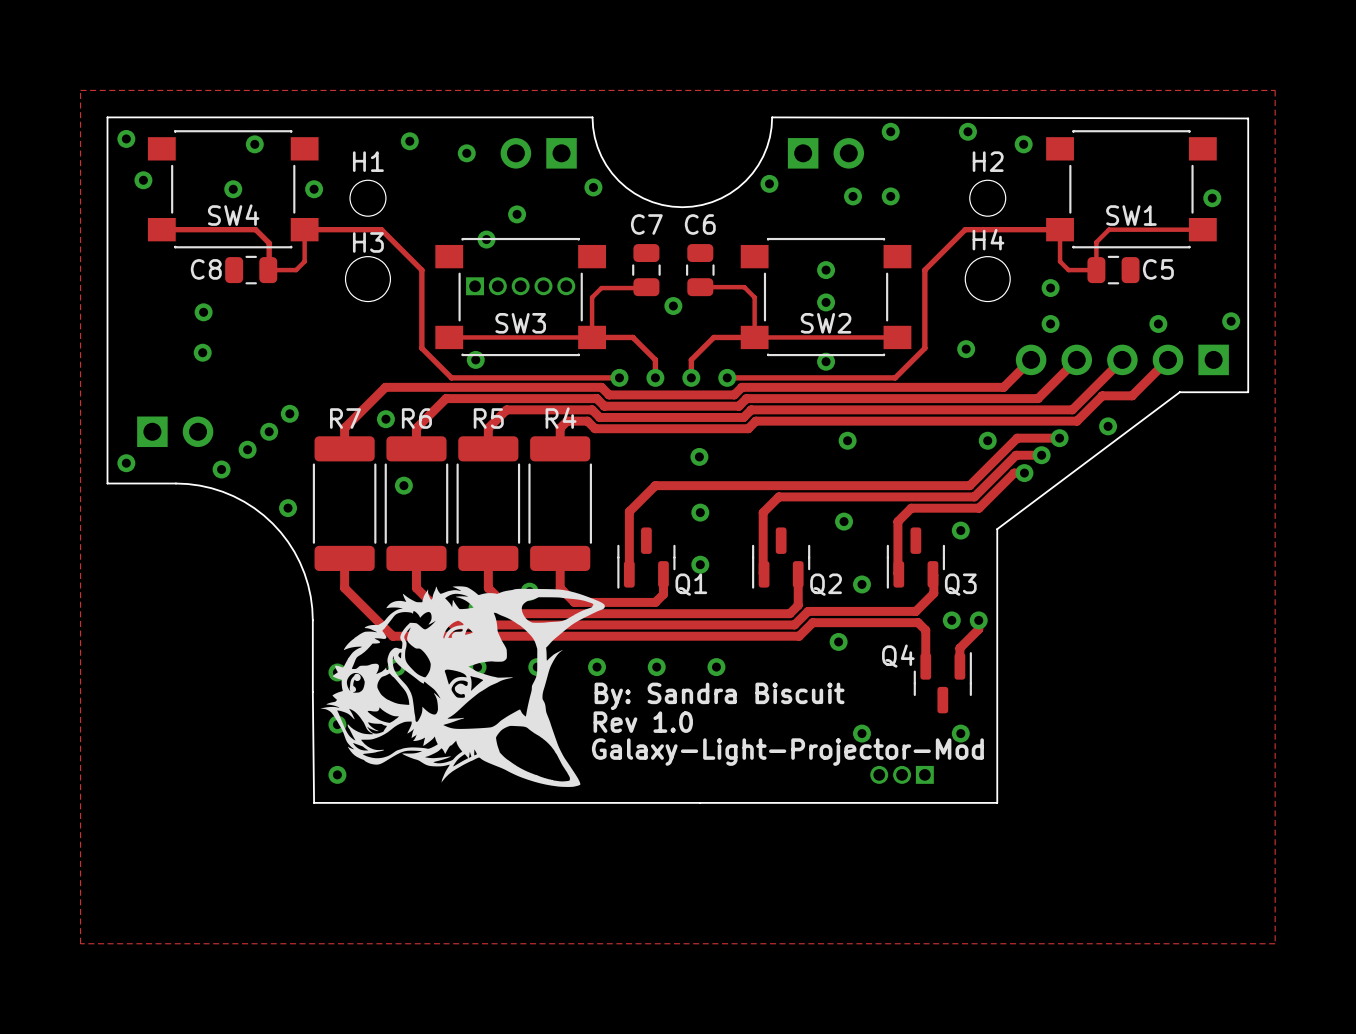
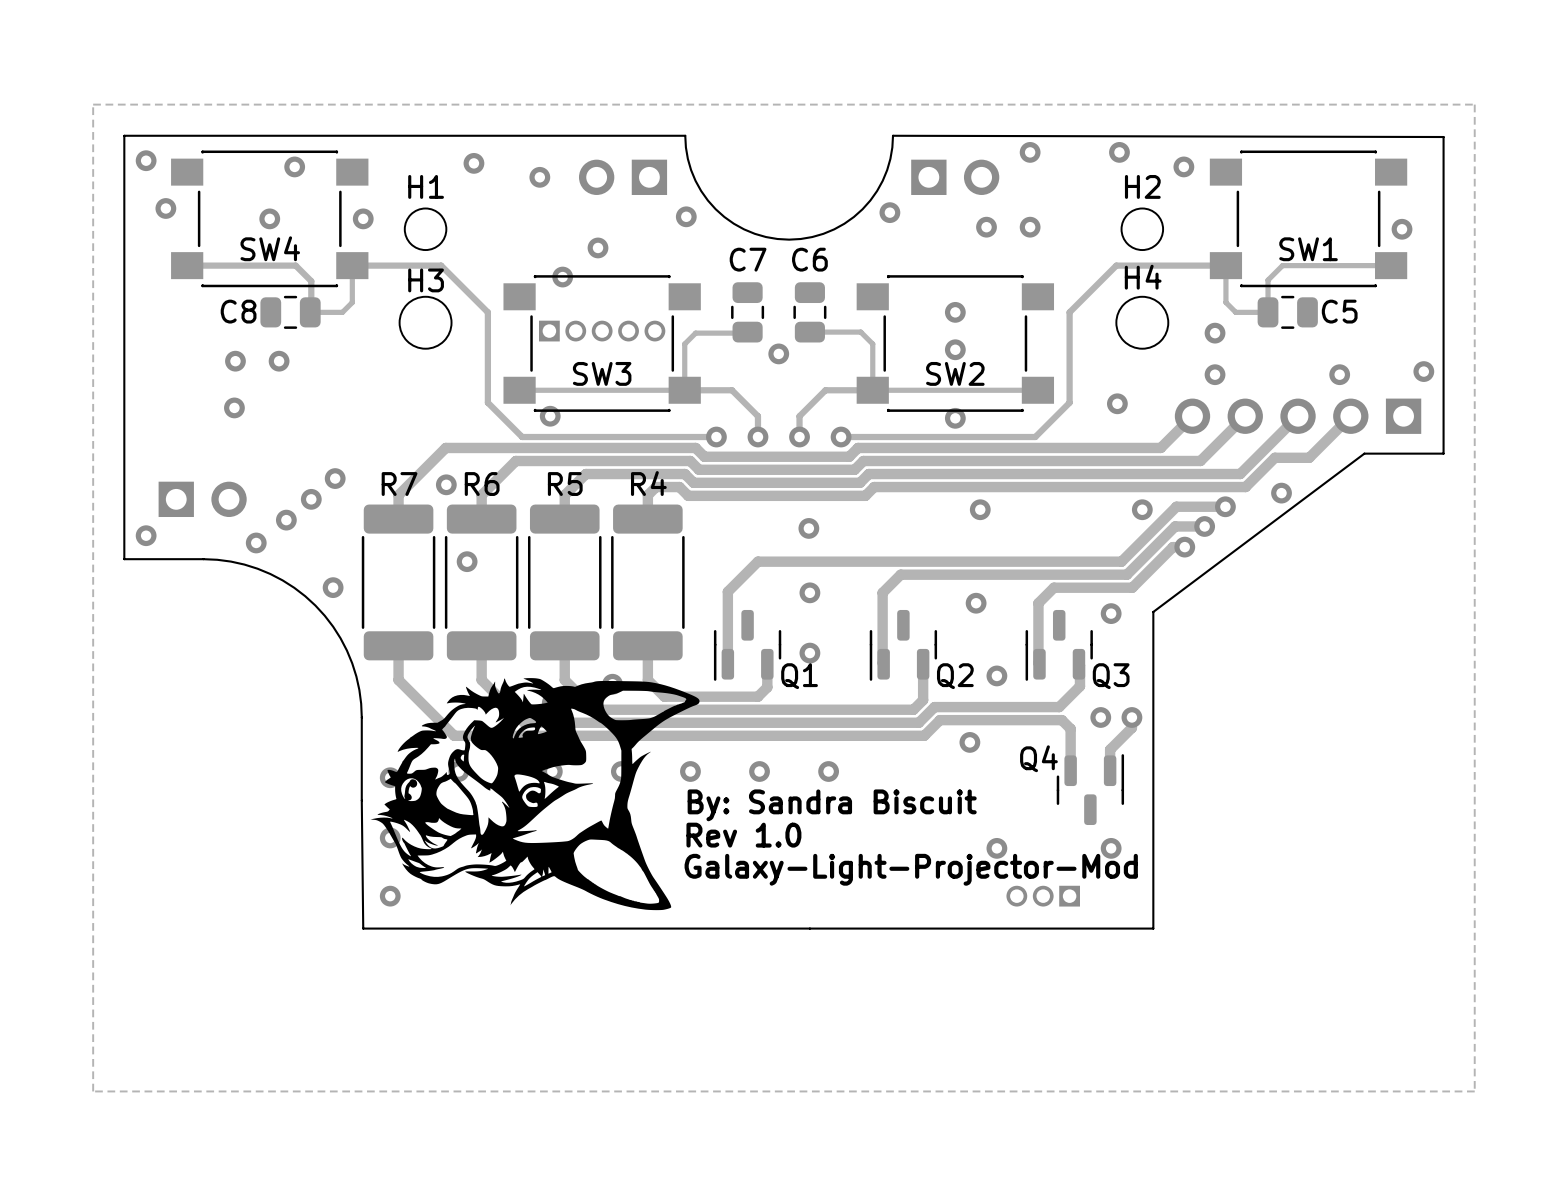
via: none -> (279, 361)

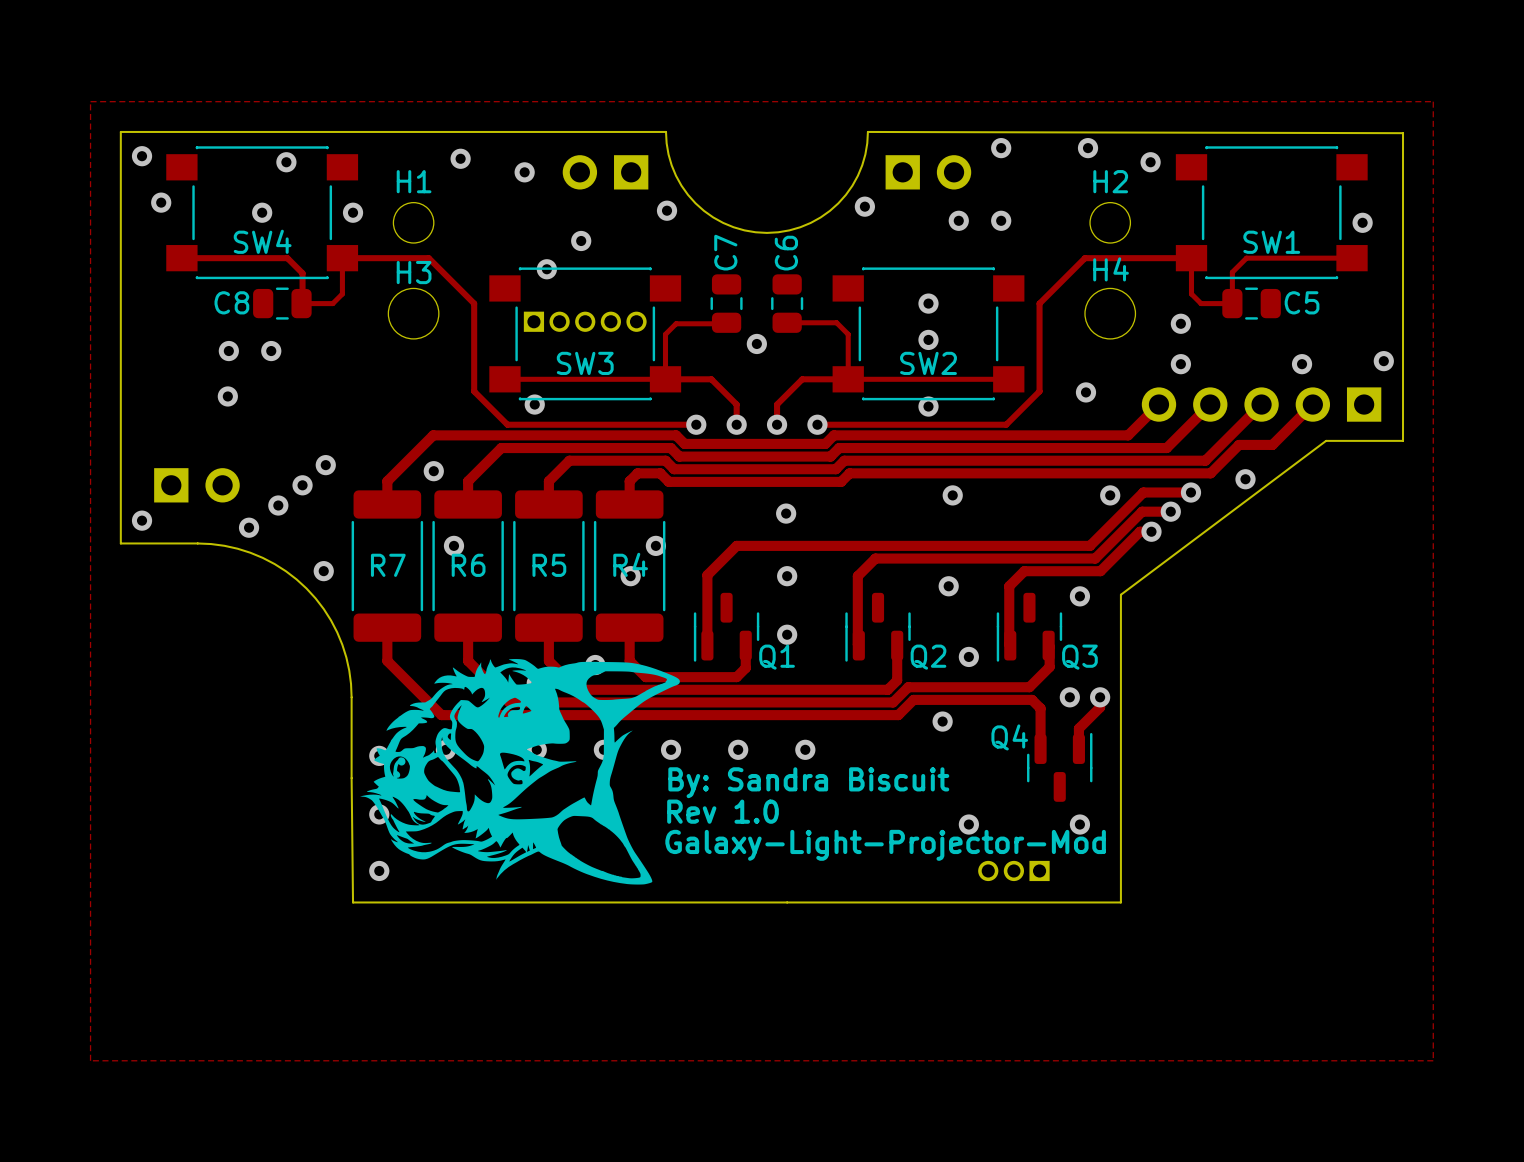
C7 name rotation: 0° (748, 259) -> 90° counterclockwise (725, 252)
C6 name rotation: 0° (809, 259) -> 90° counterclockwise (786, 253)
R4 name position: R4 (648, 483) -> R4 (630, 564)
R7 name position: R7 (399, 484) -> R7 (388, 565)
R6 name position: R6 (482, 484) -> R6 (468, 565)
R5 name position: R5 (565, 484) -> R5 (549, 565)
via: none -> (655, 545)
via: none -> (630, 576)

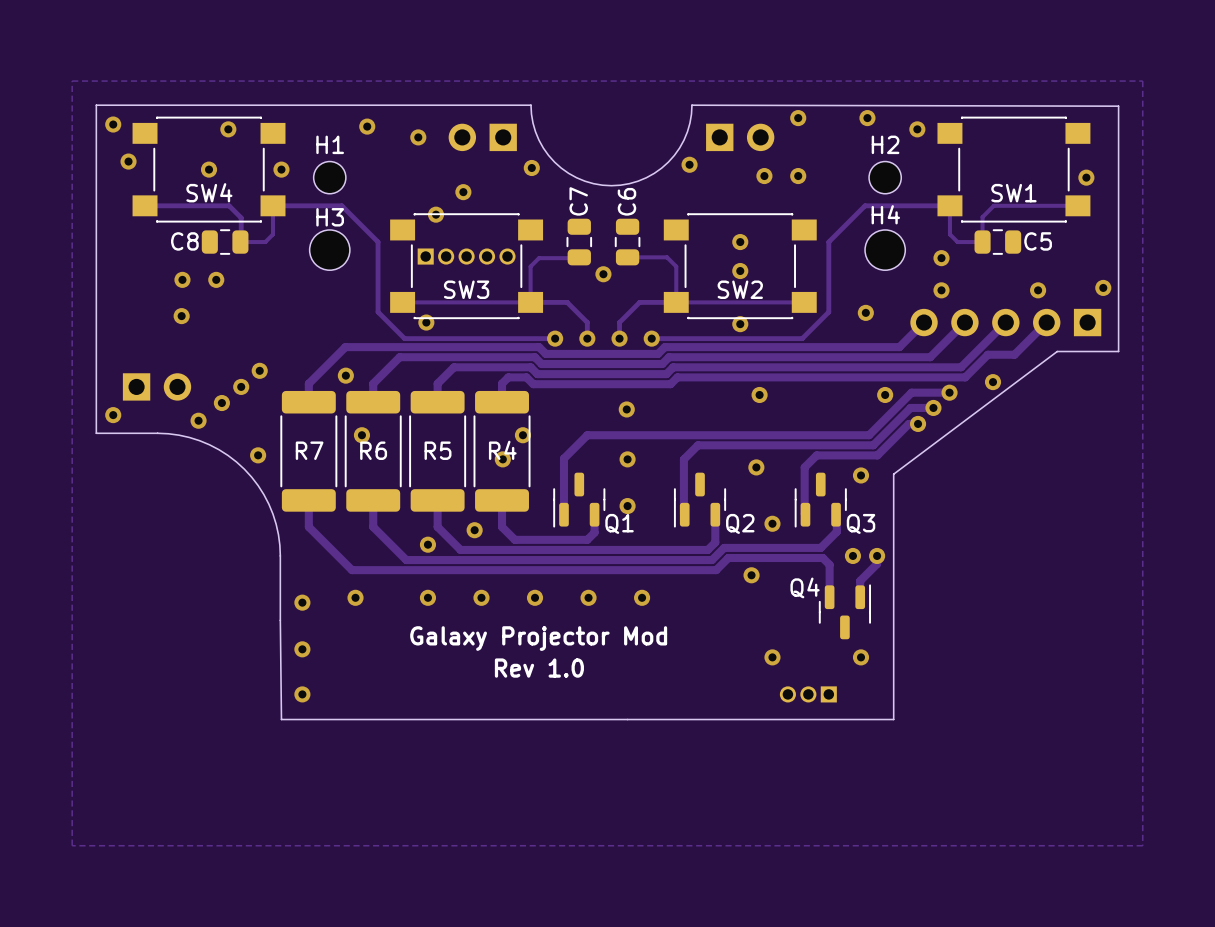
drawing: [360, 659, 680, 885] -> none
text: By: Sandra Biscuit (808, 782) -> none
text: none -> Galaxy Projector Mod (538, 638)
text position: Rev 1.0 (723, 811) -> Rev 1.0 (539, 668)
text: Galaxy-Light-Projector-Mod (885, 845) -> none

